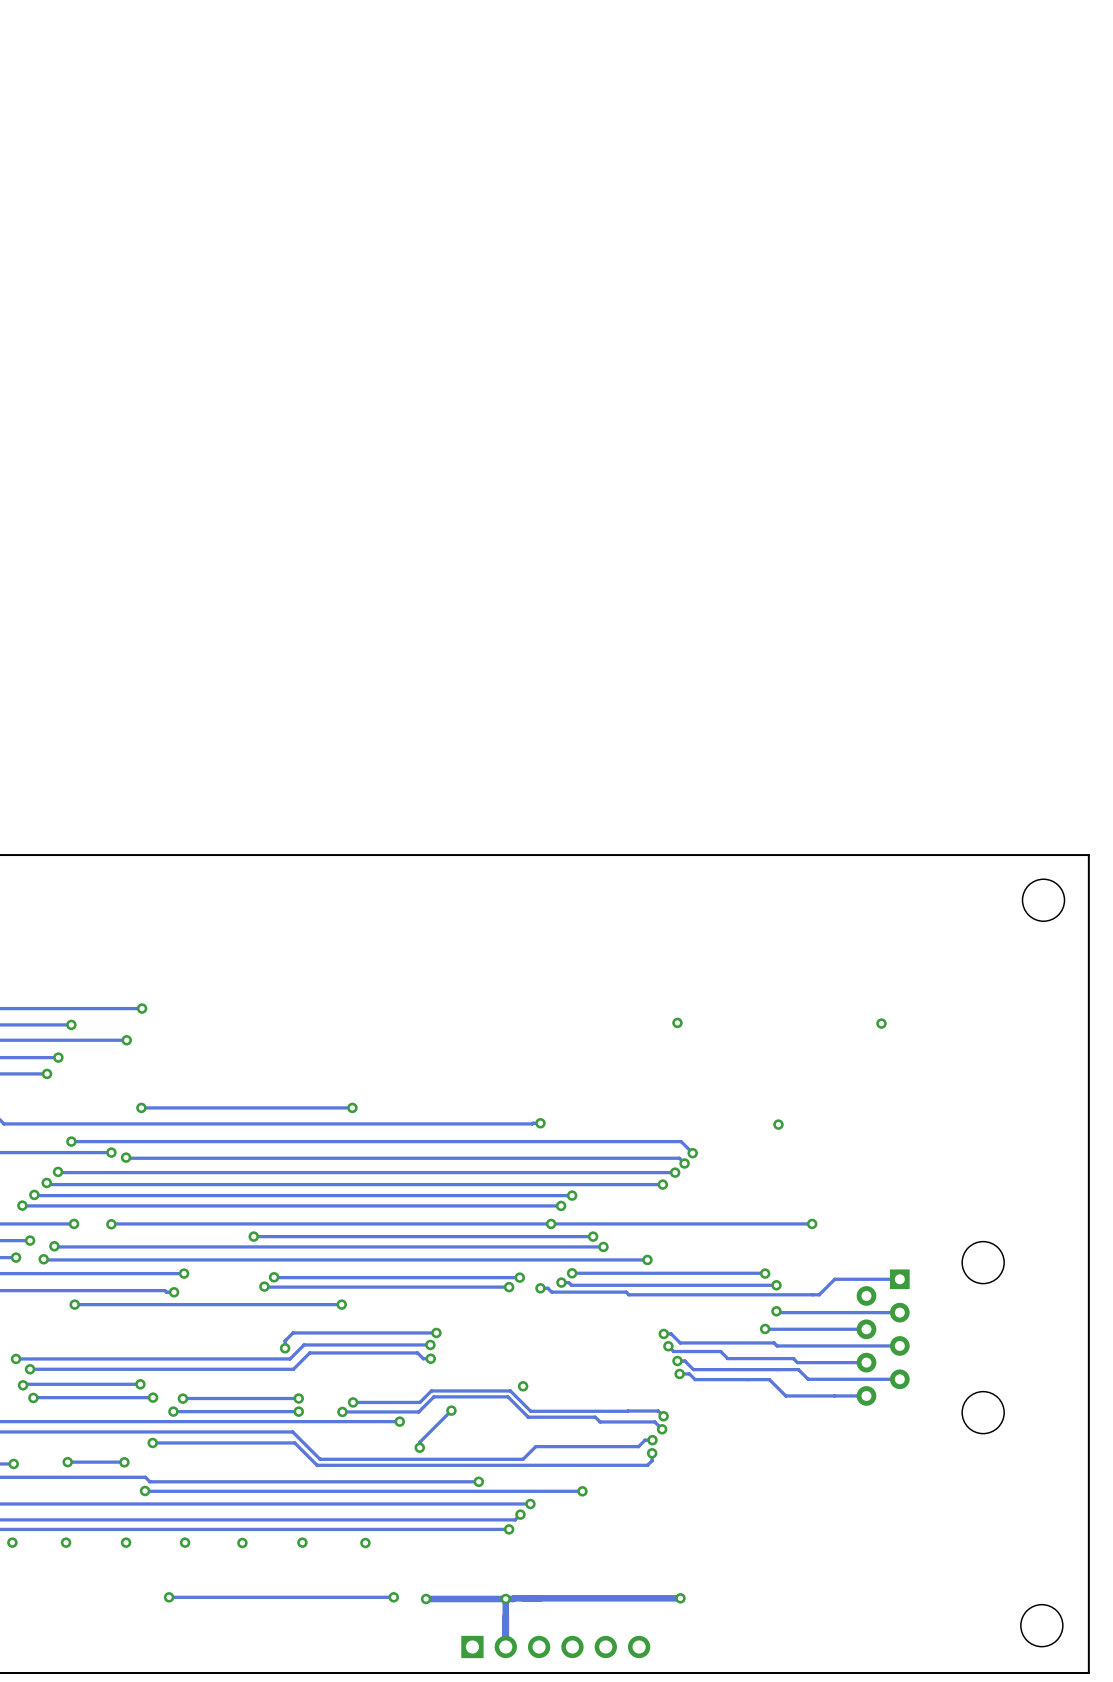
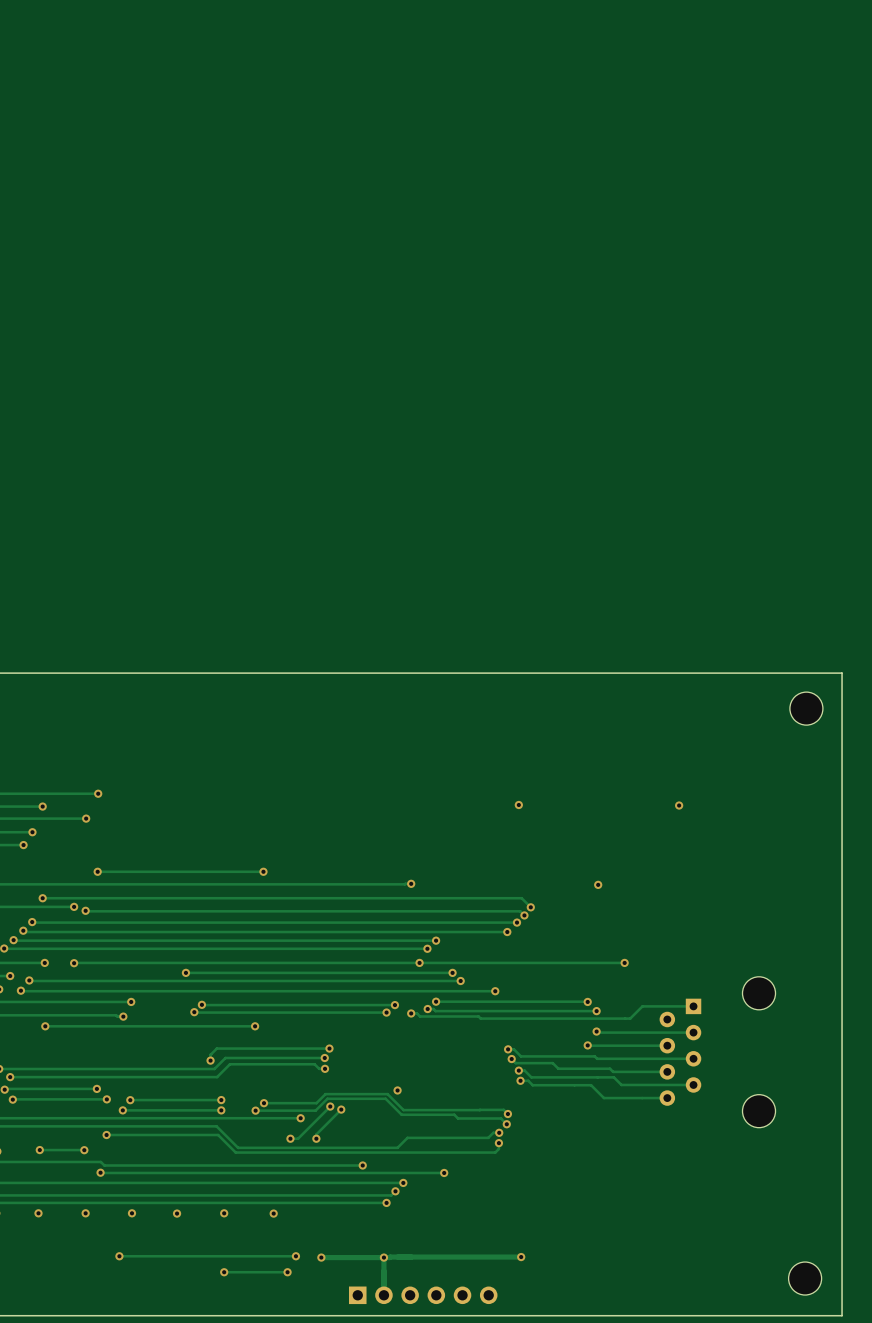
track: none -> (330, 1106) (298, 1138) (290, 1138)
via: none -> (330, 1106)
via: none -> (290, 1138)
via: none -> (224, 1272)
track: none -> (287, 1272) (224, 1272)
via: none -> (287, 1272)

